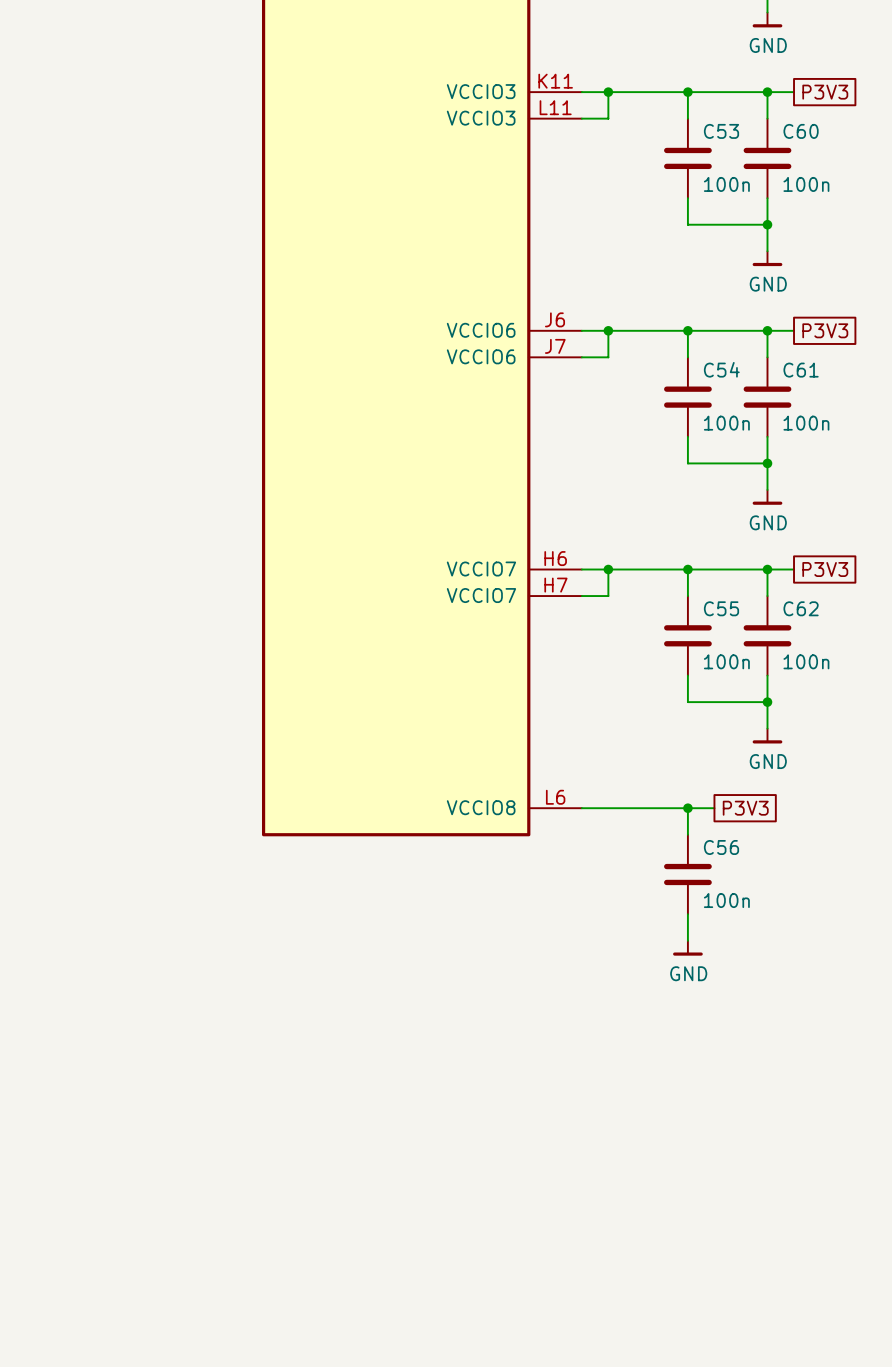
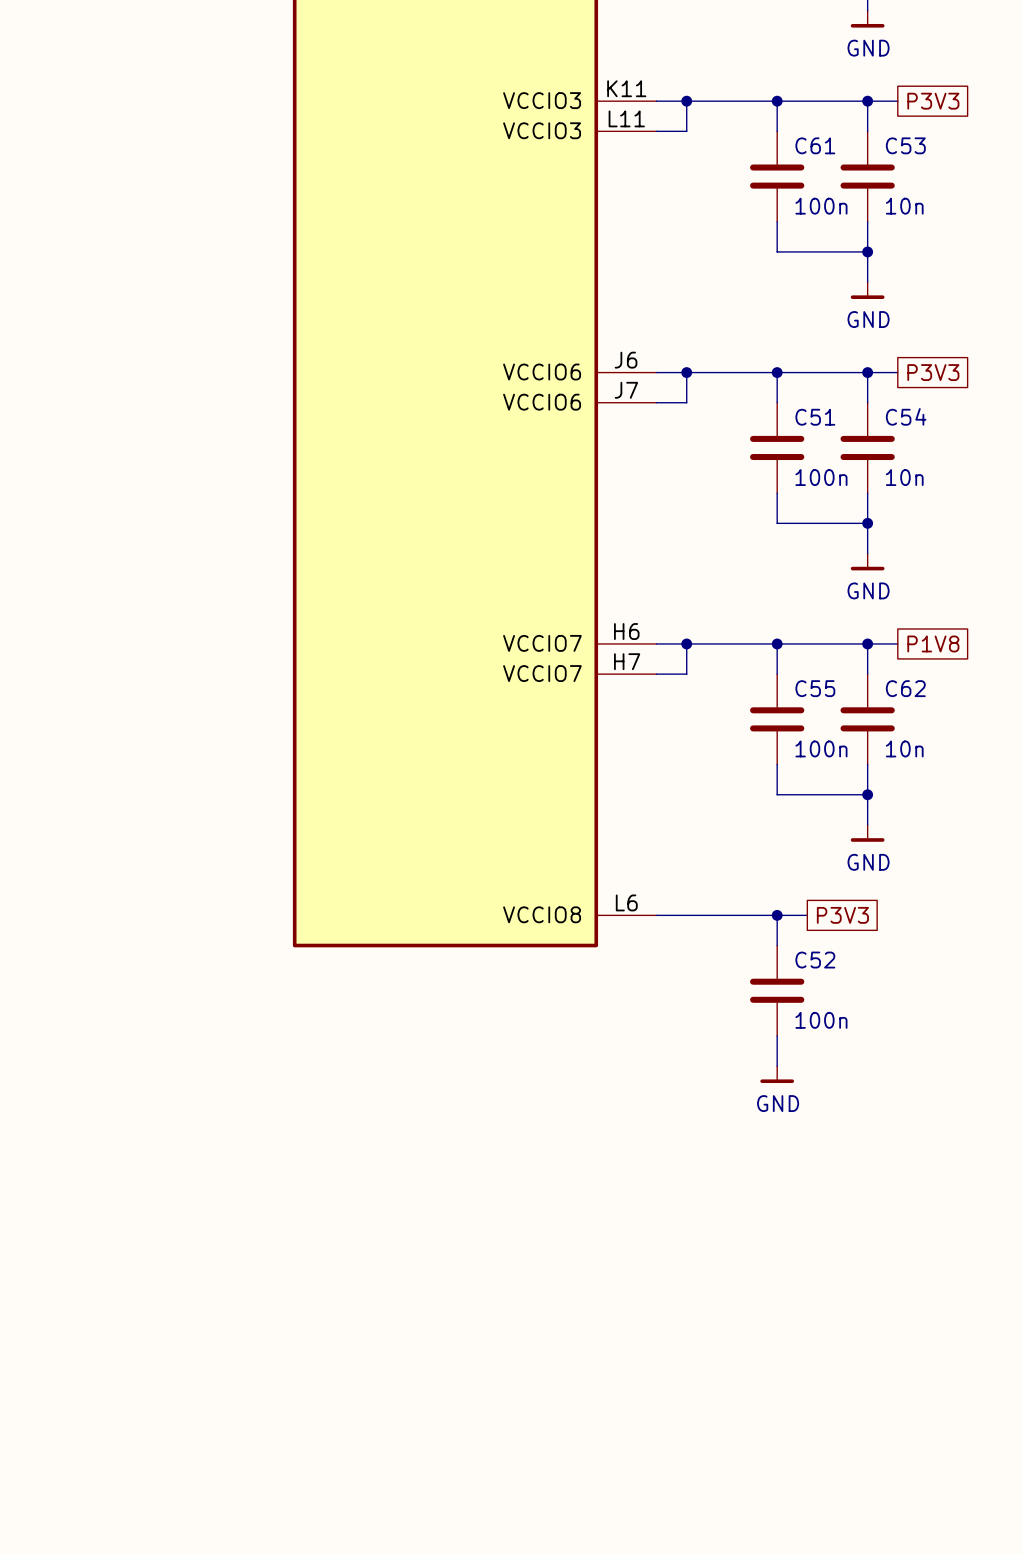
C53 name: C53 (721, 131) -> C61 (815, 145)
C60 name: C60 (801, 131) -> C53 (905, 145)
C60 value: 100n (806, 184) -> 10n (904, 206)
C54 name: C54 (721, 369) -> C51 (815, 417)
C61 name: C61 (801, 370) -> C54 (906, 416)
C61 value: 100n (806, 423) -> 10n (904, 477)
global label: P3V3 (825, 569) -> P1V8 (933, 643)
C62 value: 100n (806, 661) -> 10n (904, 748)
C56 name: C56 (721, 847) -> C52 (815, 960)

